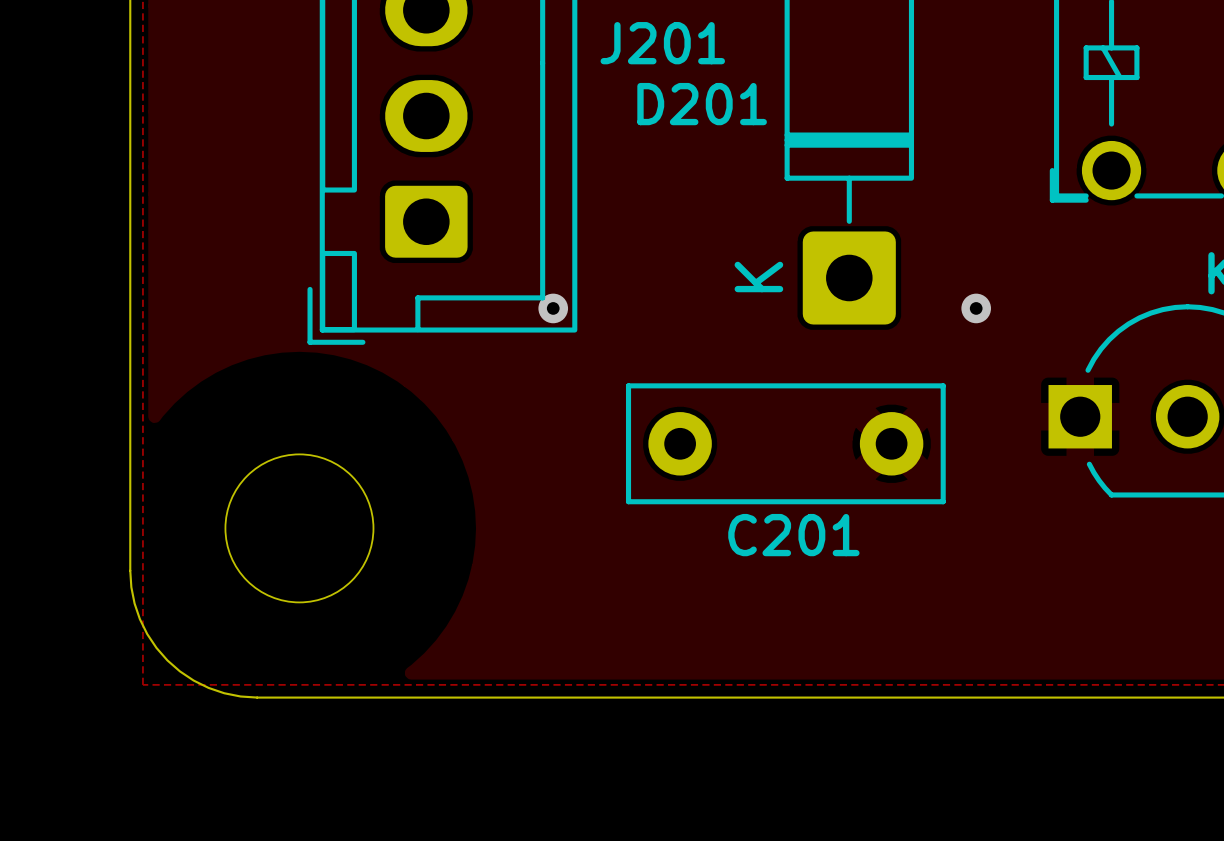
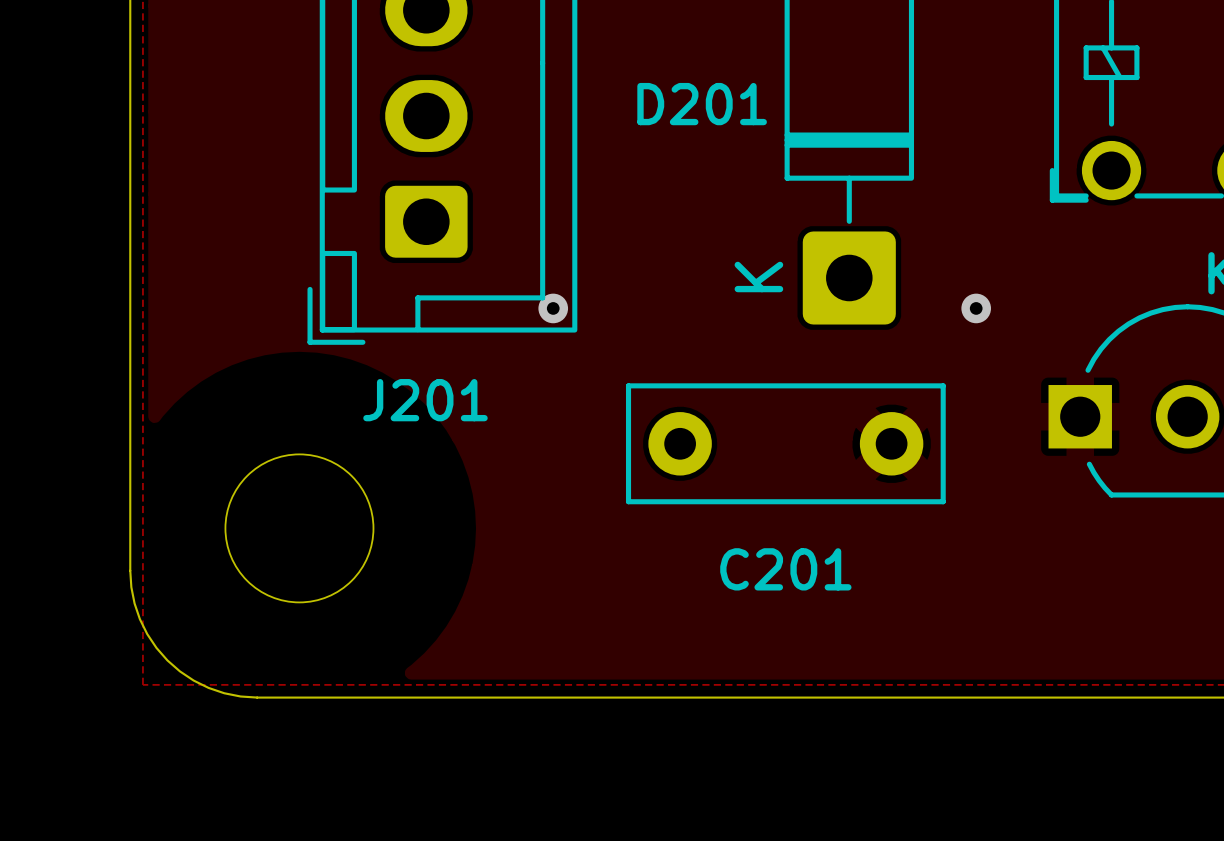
J201 name position: J201 (662, 43) -> J201 (425, 400)
C201 name position: C201 (793, 535) -> C201 (785, 569)

